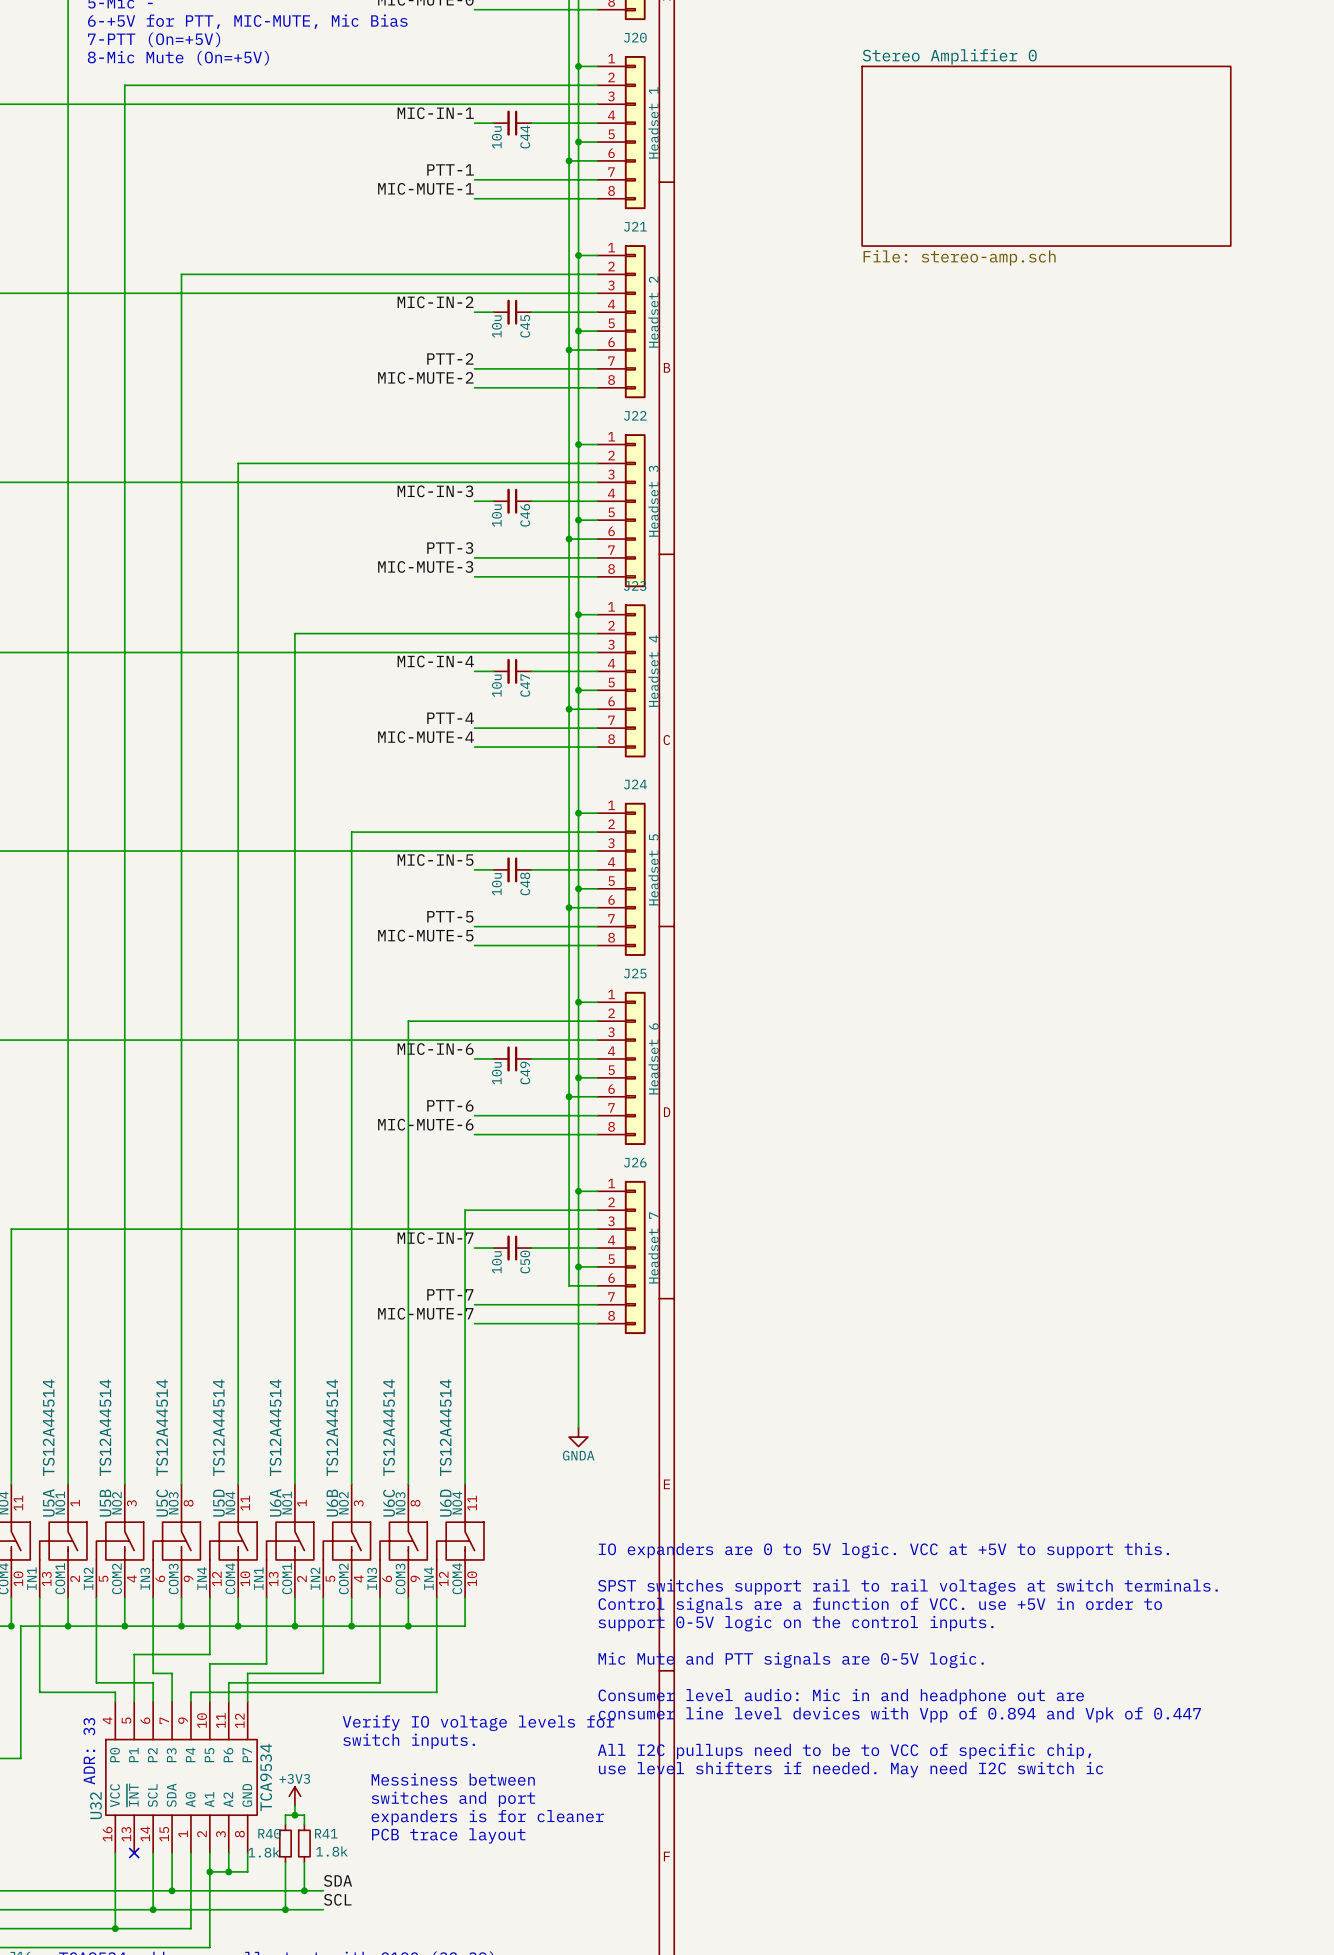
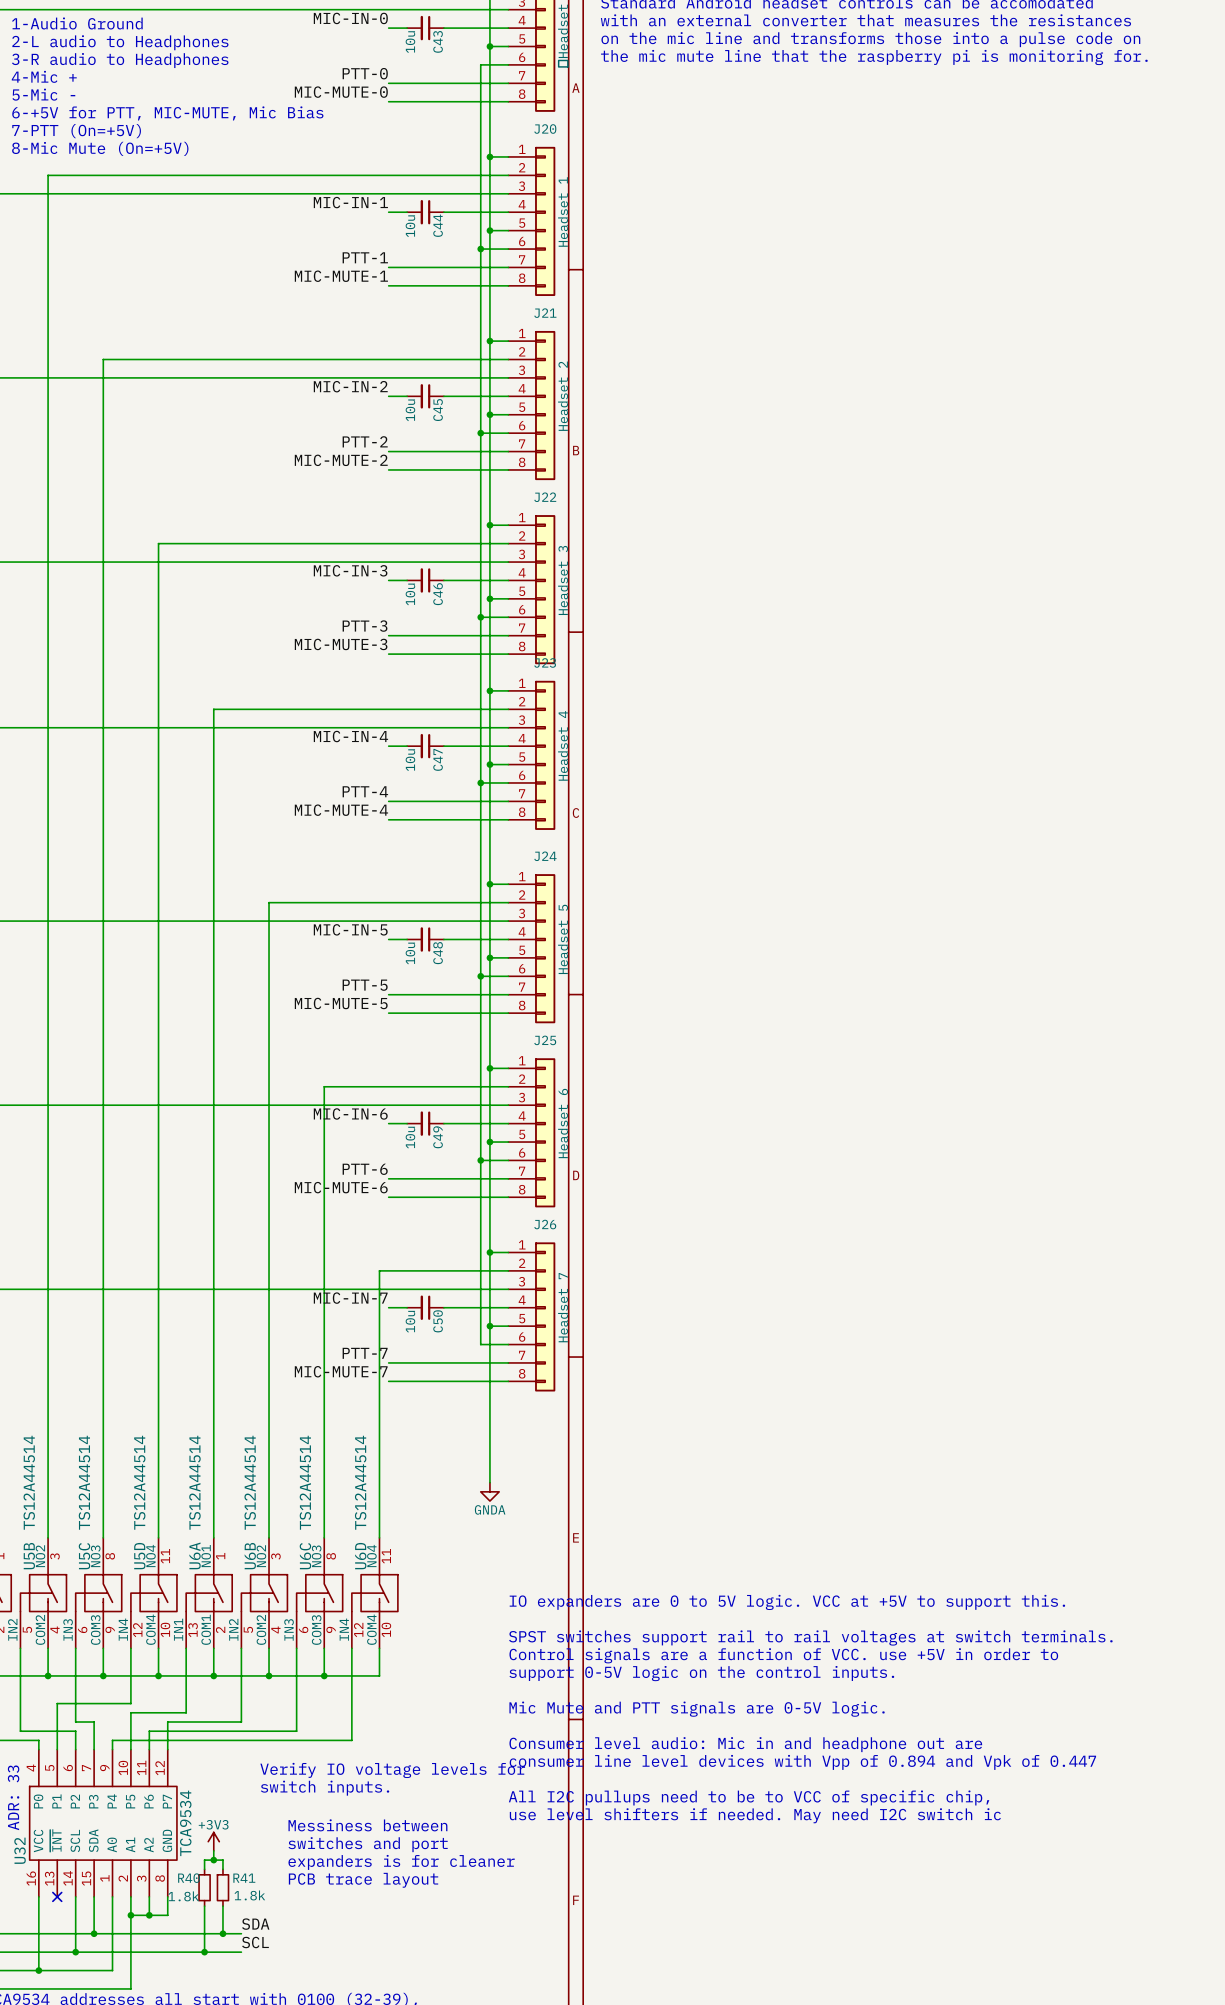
sheet Stereo Amplifier 0: File: stereo-amp.sch (1046, 156) -> none

